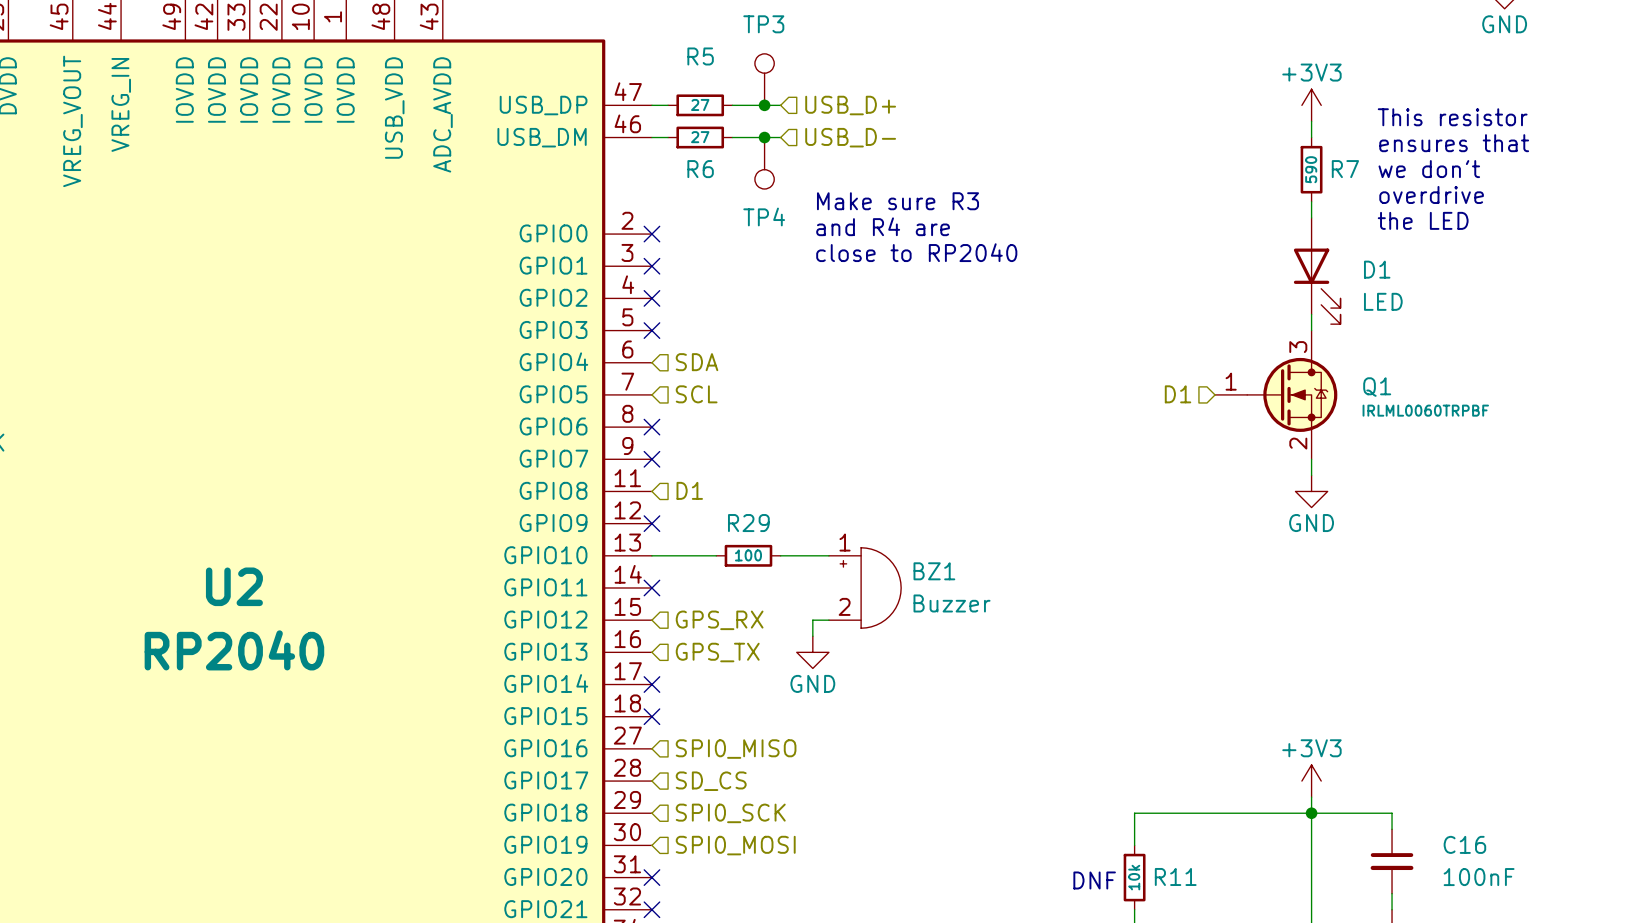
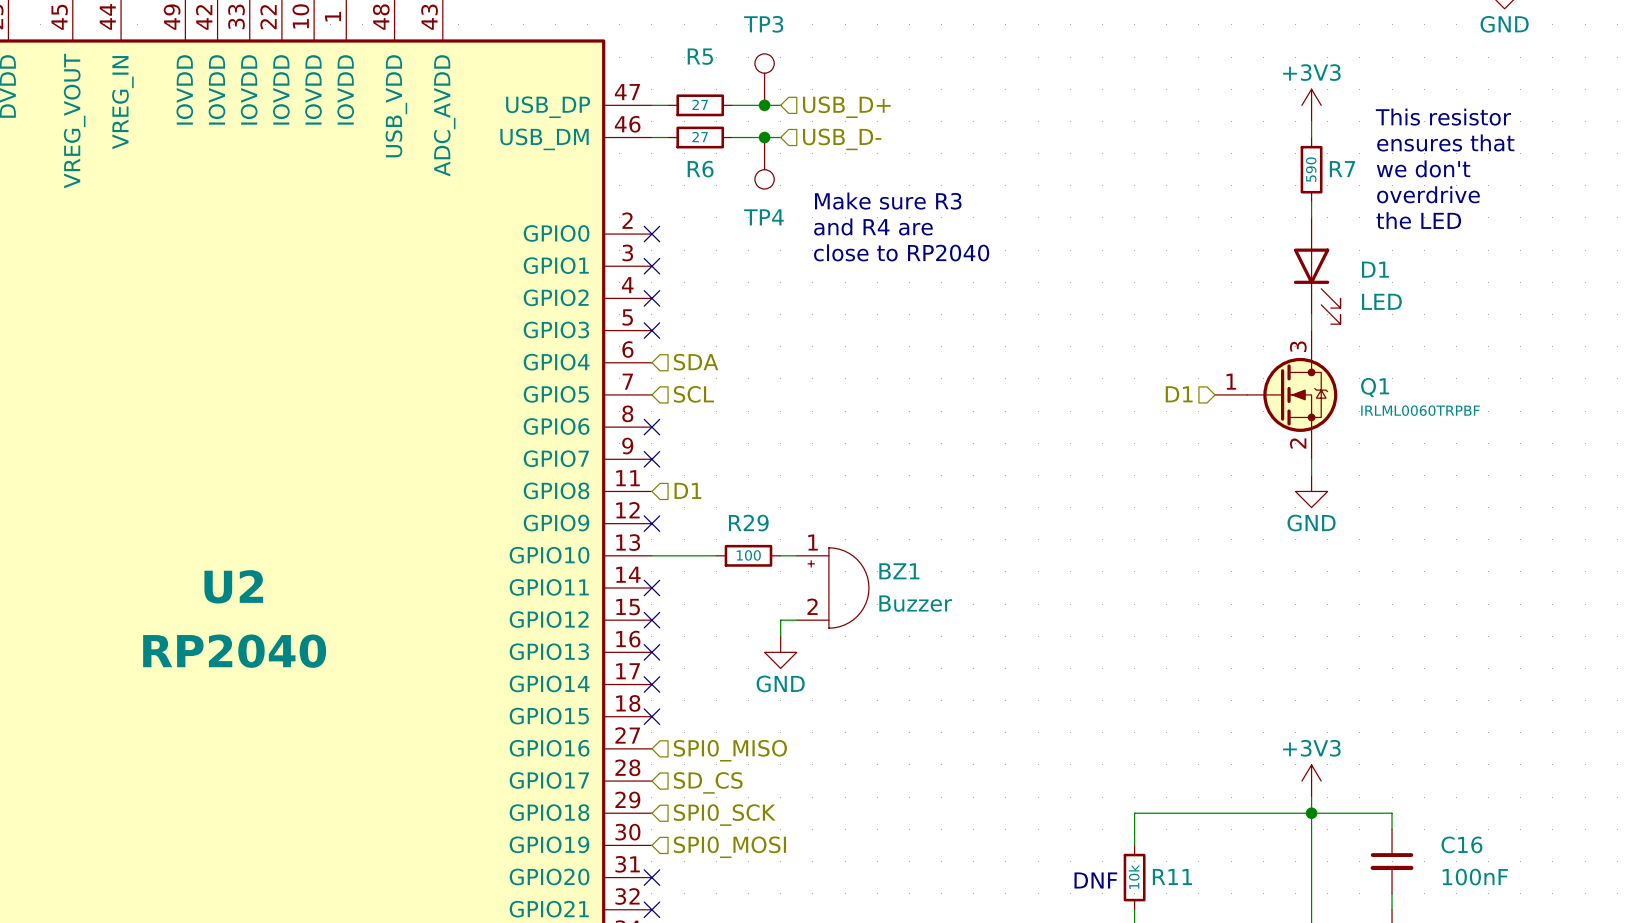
BZ1 position: (865, 587) -> (832, 587)
no-connect mark: none -> (651, 620)
hierarchical label: GPS_RX (719, 620) -> none
wire: (828, 620) (812, 620) (812, 636) -> (796, 620) (780, 620) (780, 636)
no-connect mark: none -> (651, 652)
hierarchical label: GPS_TX (717, 652) -> none
power symbol position: GND (812, 652) -> GND (780, 652)

